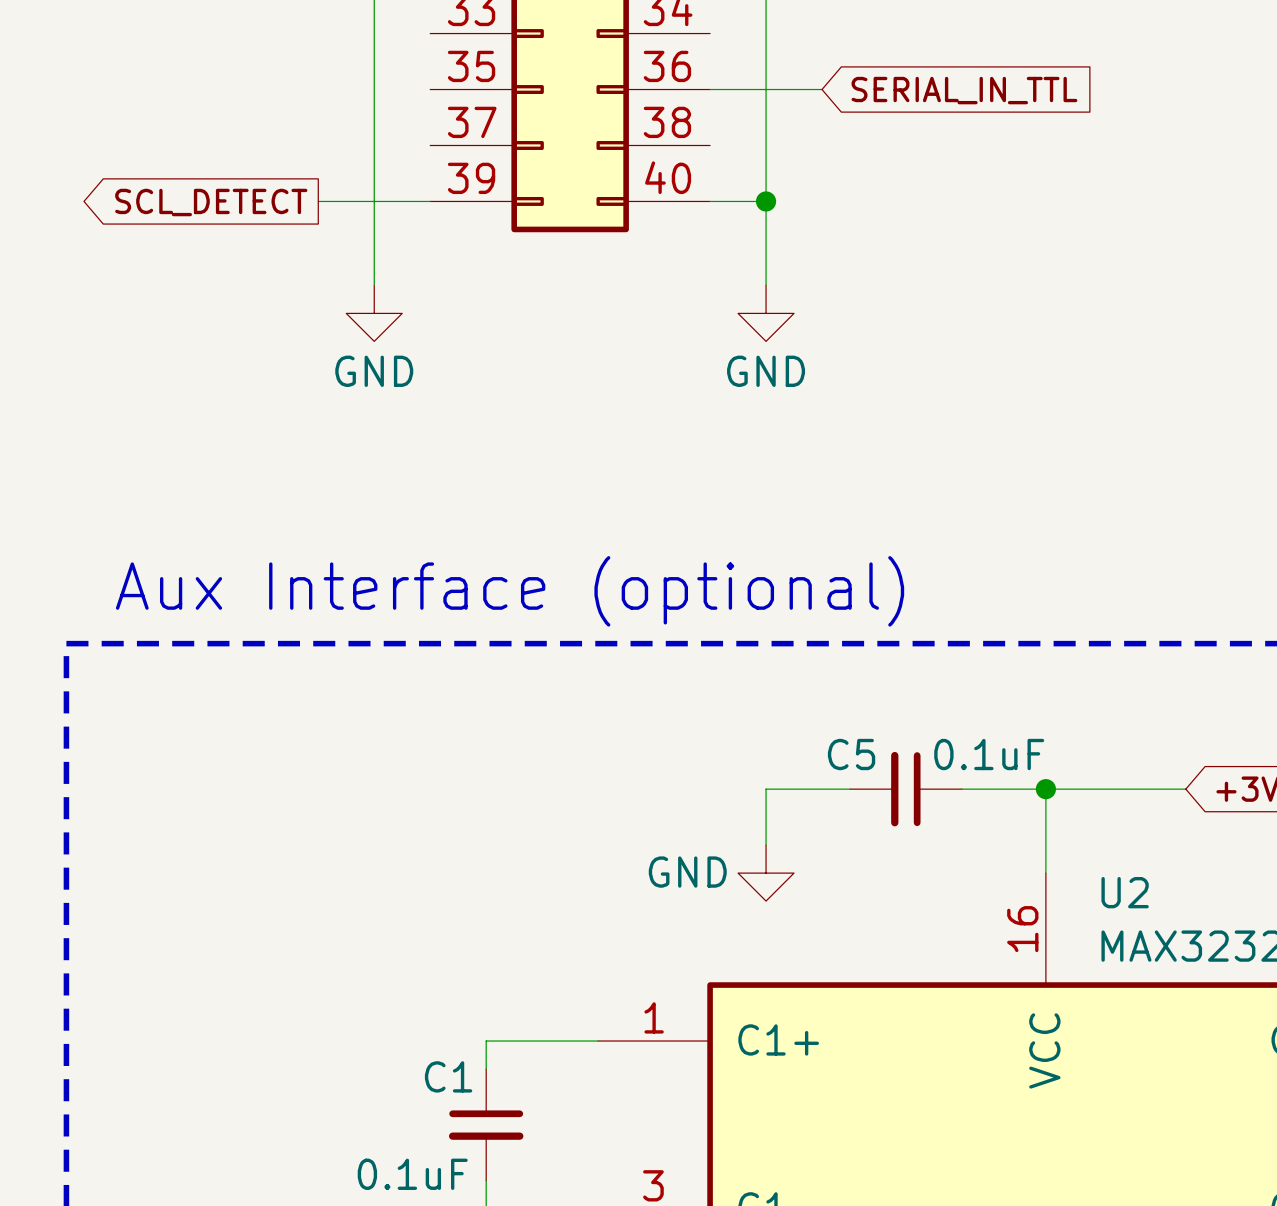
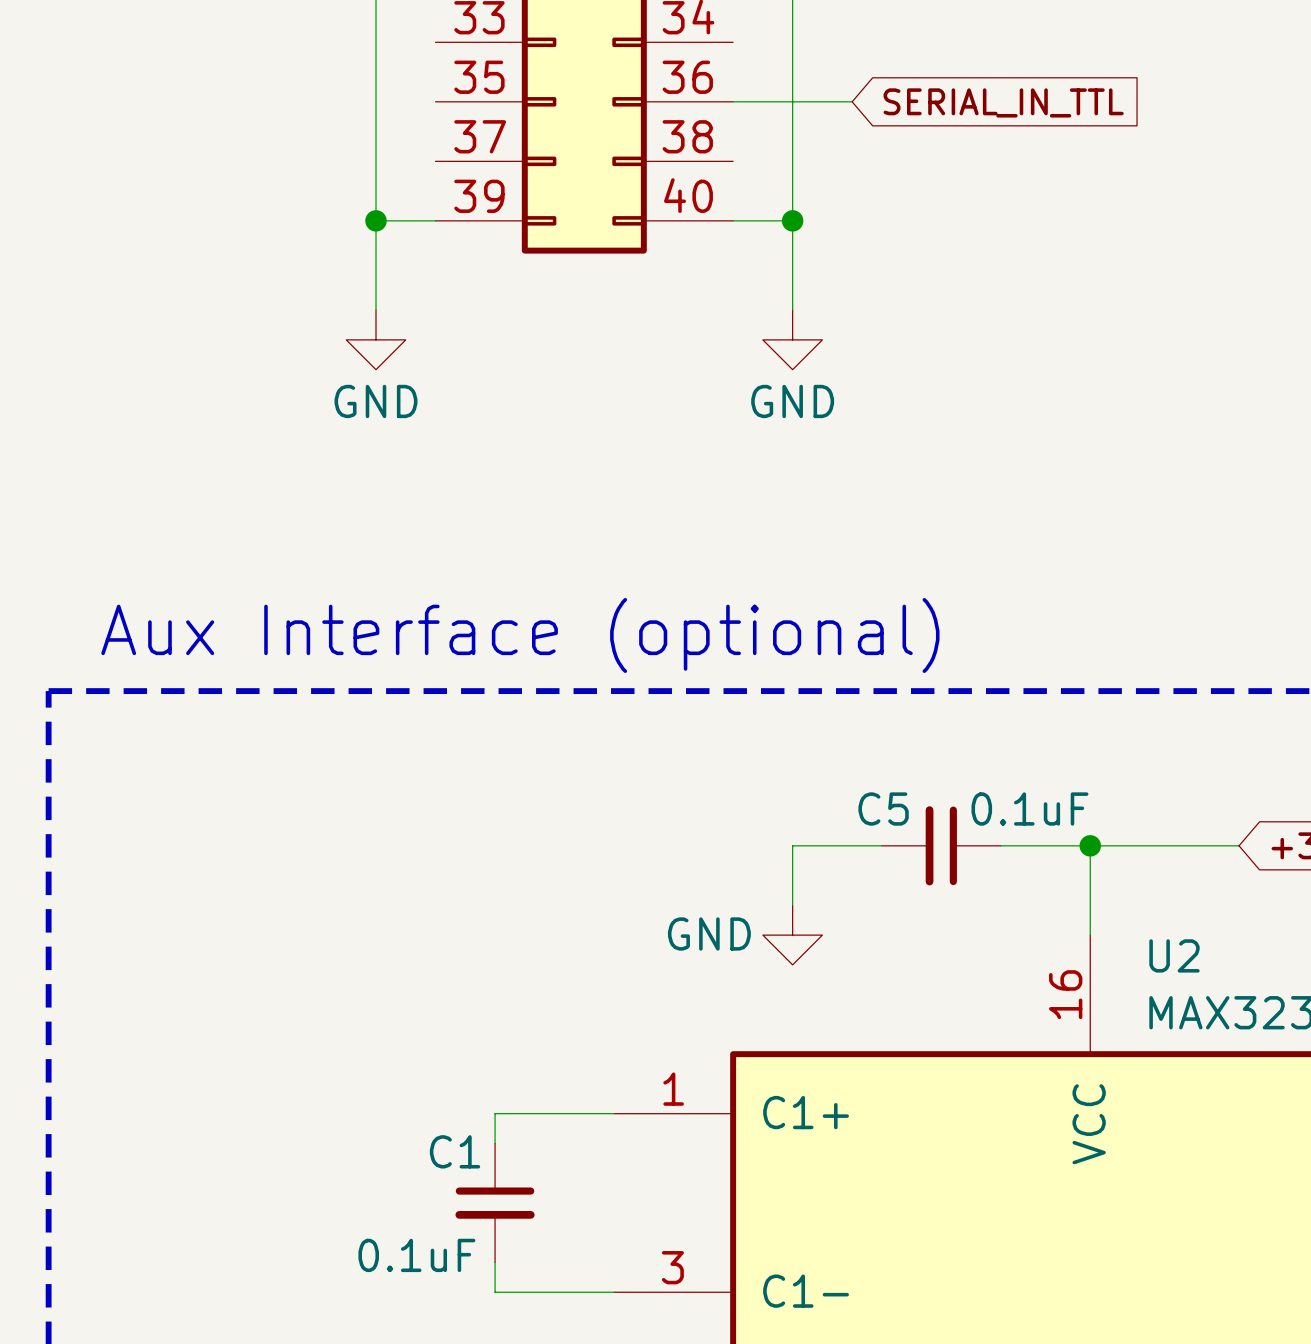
wire: (318, 201) (374, 201) -> none
junction: none -> (376, 220)
global label: SCL_DETECT (211, 202) -> none

